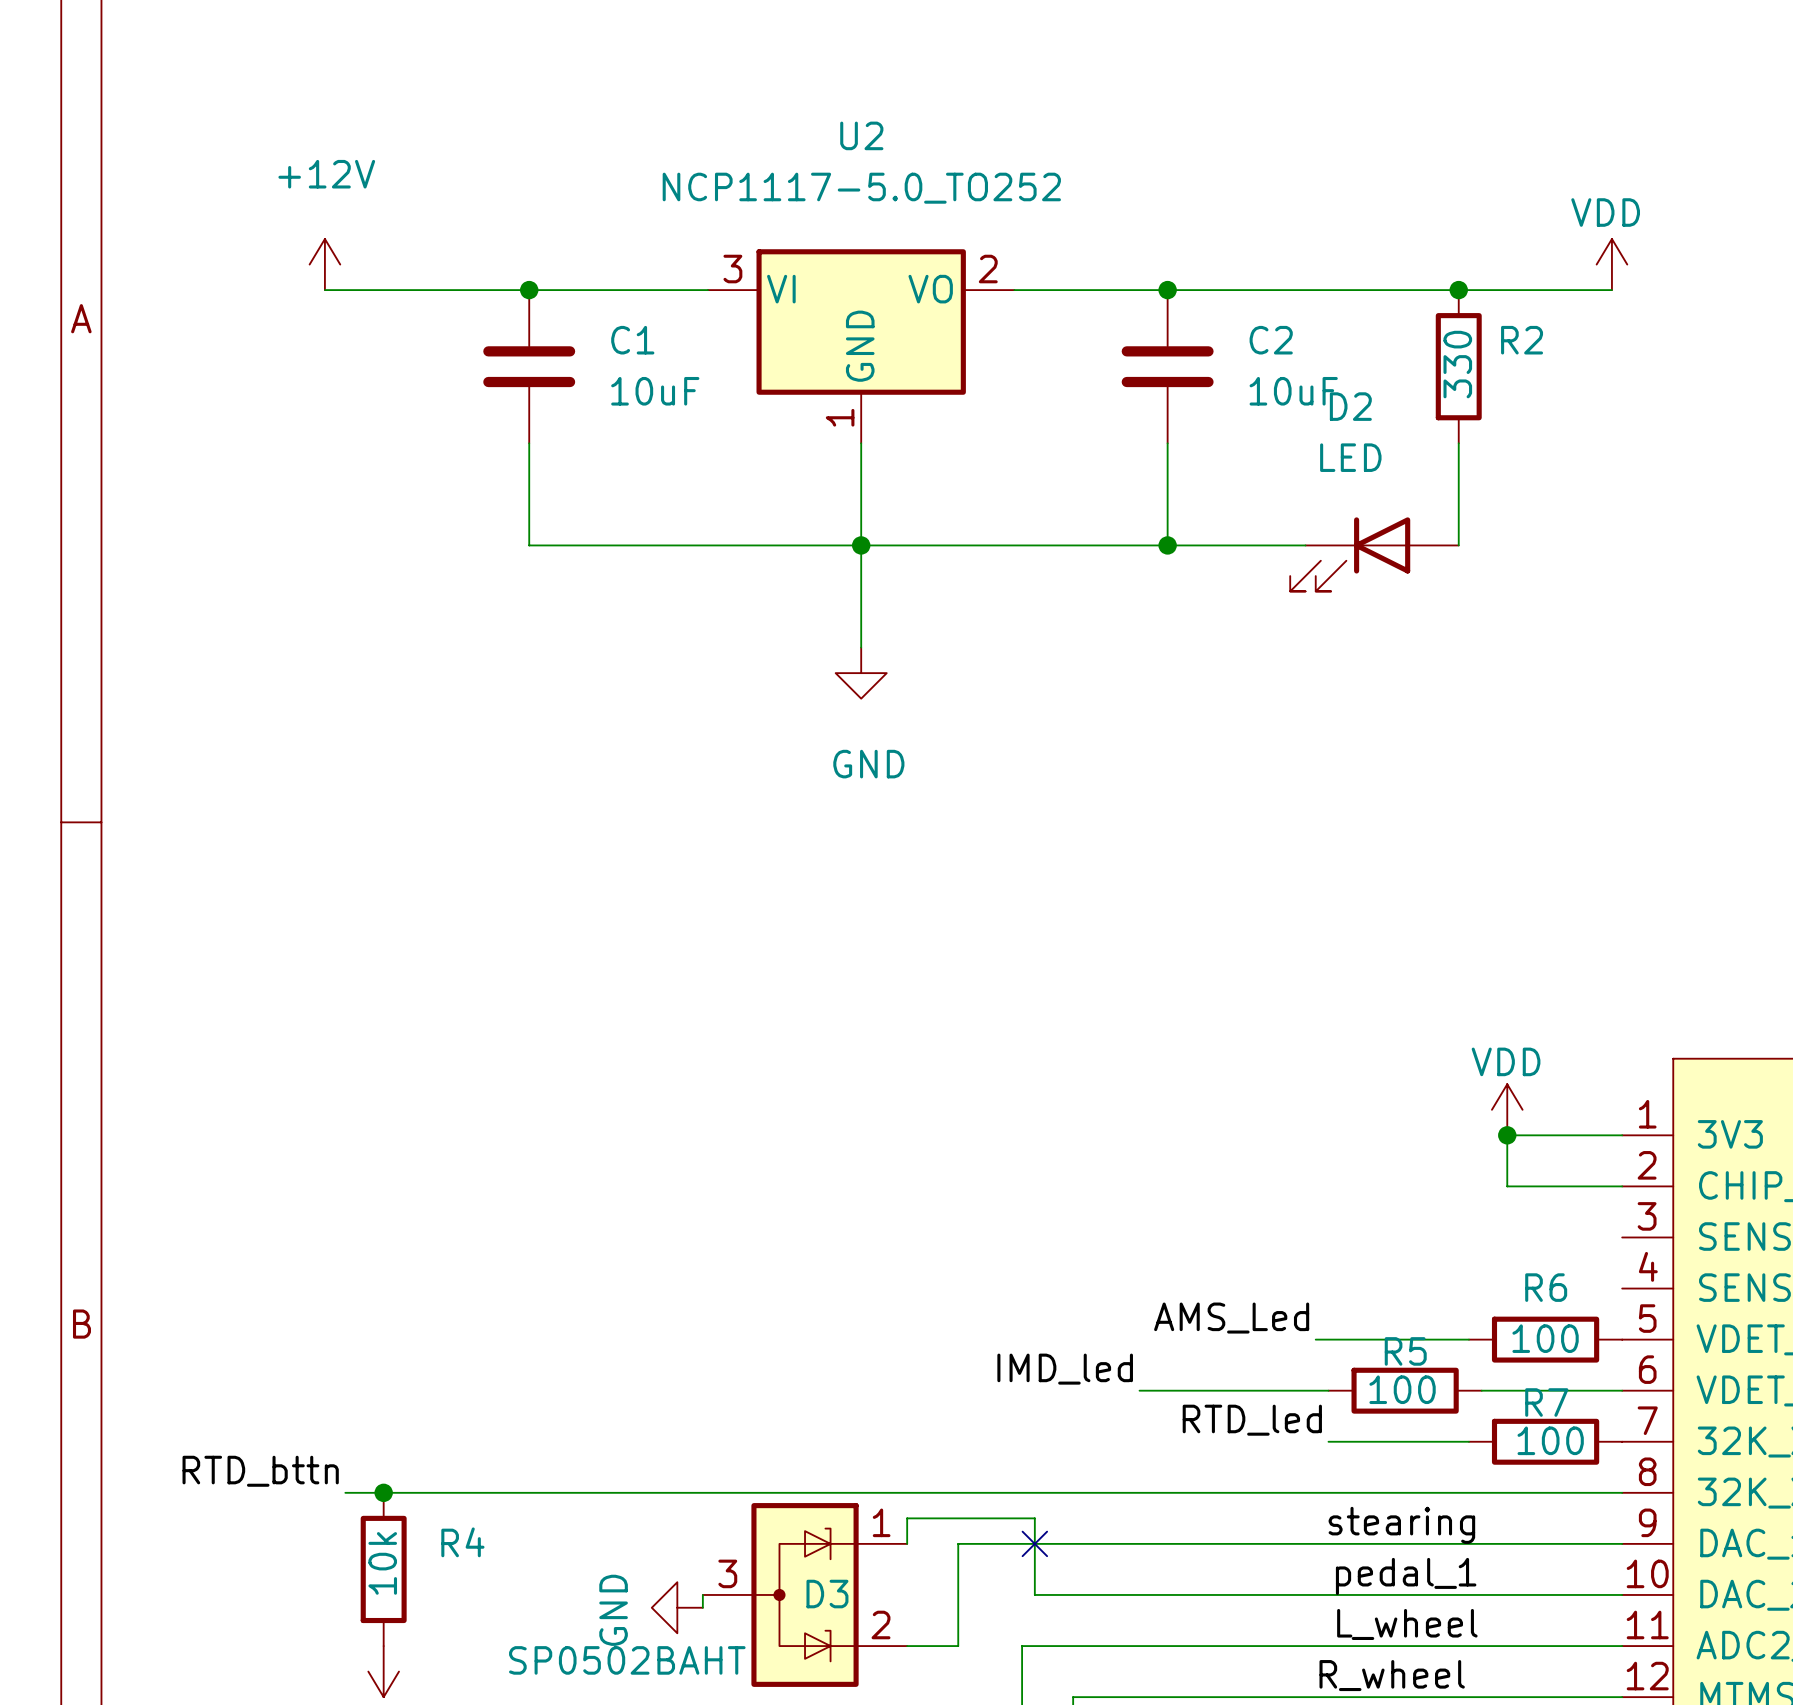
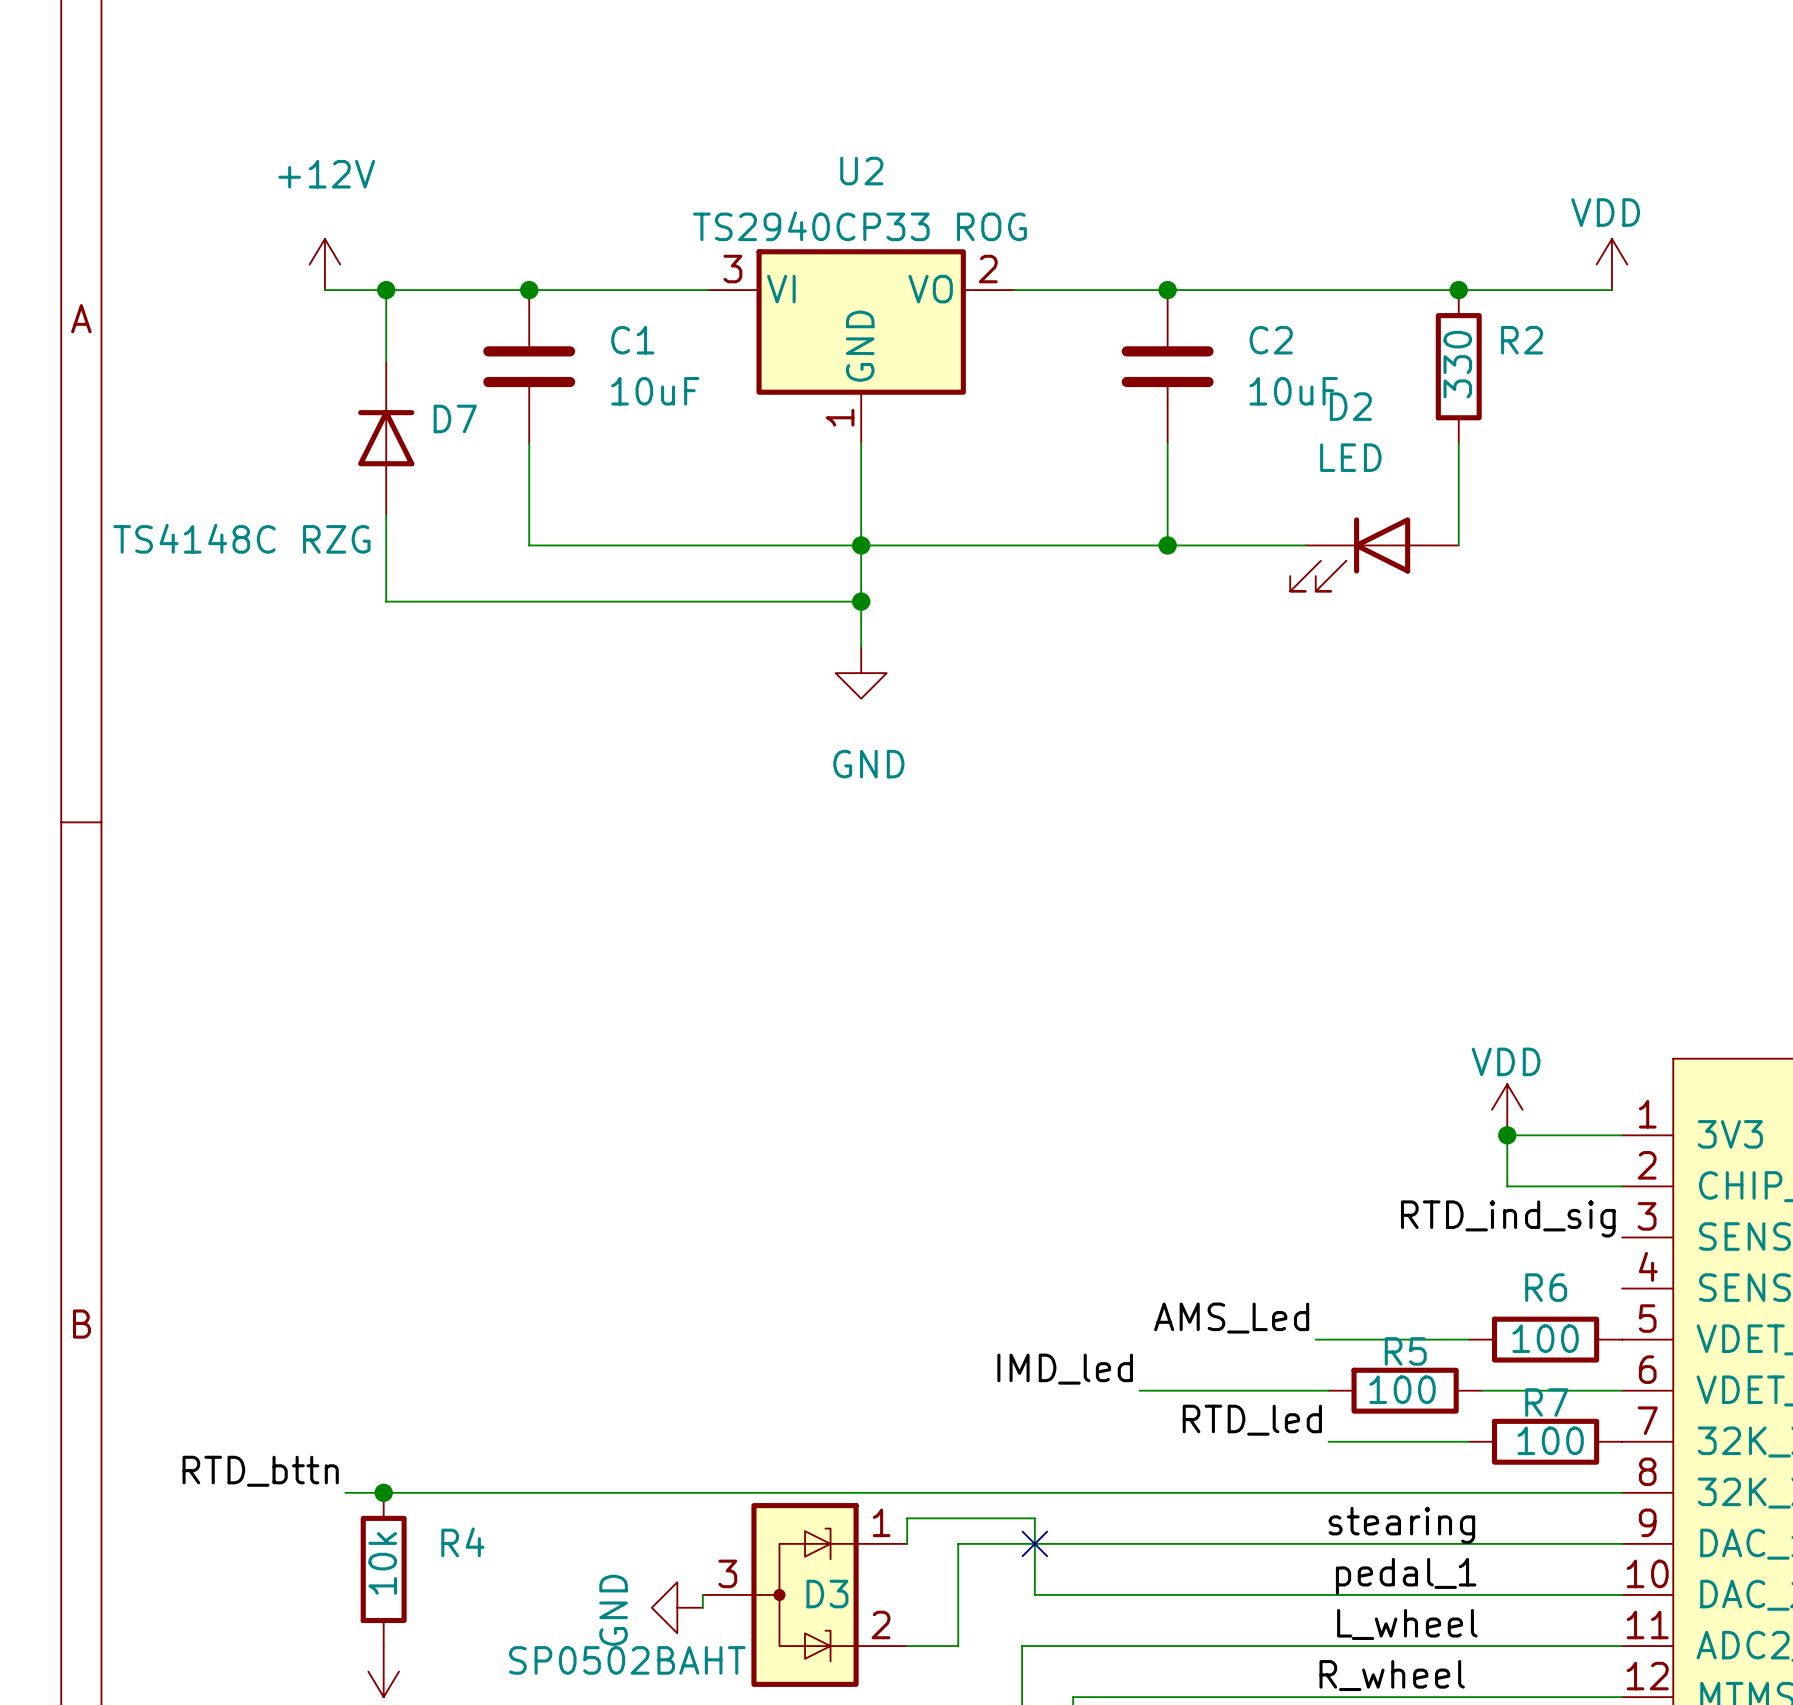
U2 name position: U2 (861, 135) -> U2 (861, 171)
U2 value: NCP1117-5.0_TO252 (861, 188) -> TS2940CP33 ROG (859, 226)
wire: none -> (386, 290) (386, 361)
junction: none -> (386, 290)
D7: none -> TS4148C RZG (386, 438)
wire: none -> (386, 514) (386, 601) (861, 601)
junction: none -> (861, 601)
label: none -> RTD_ind_sig (1508, 1218)

